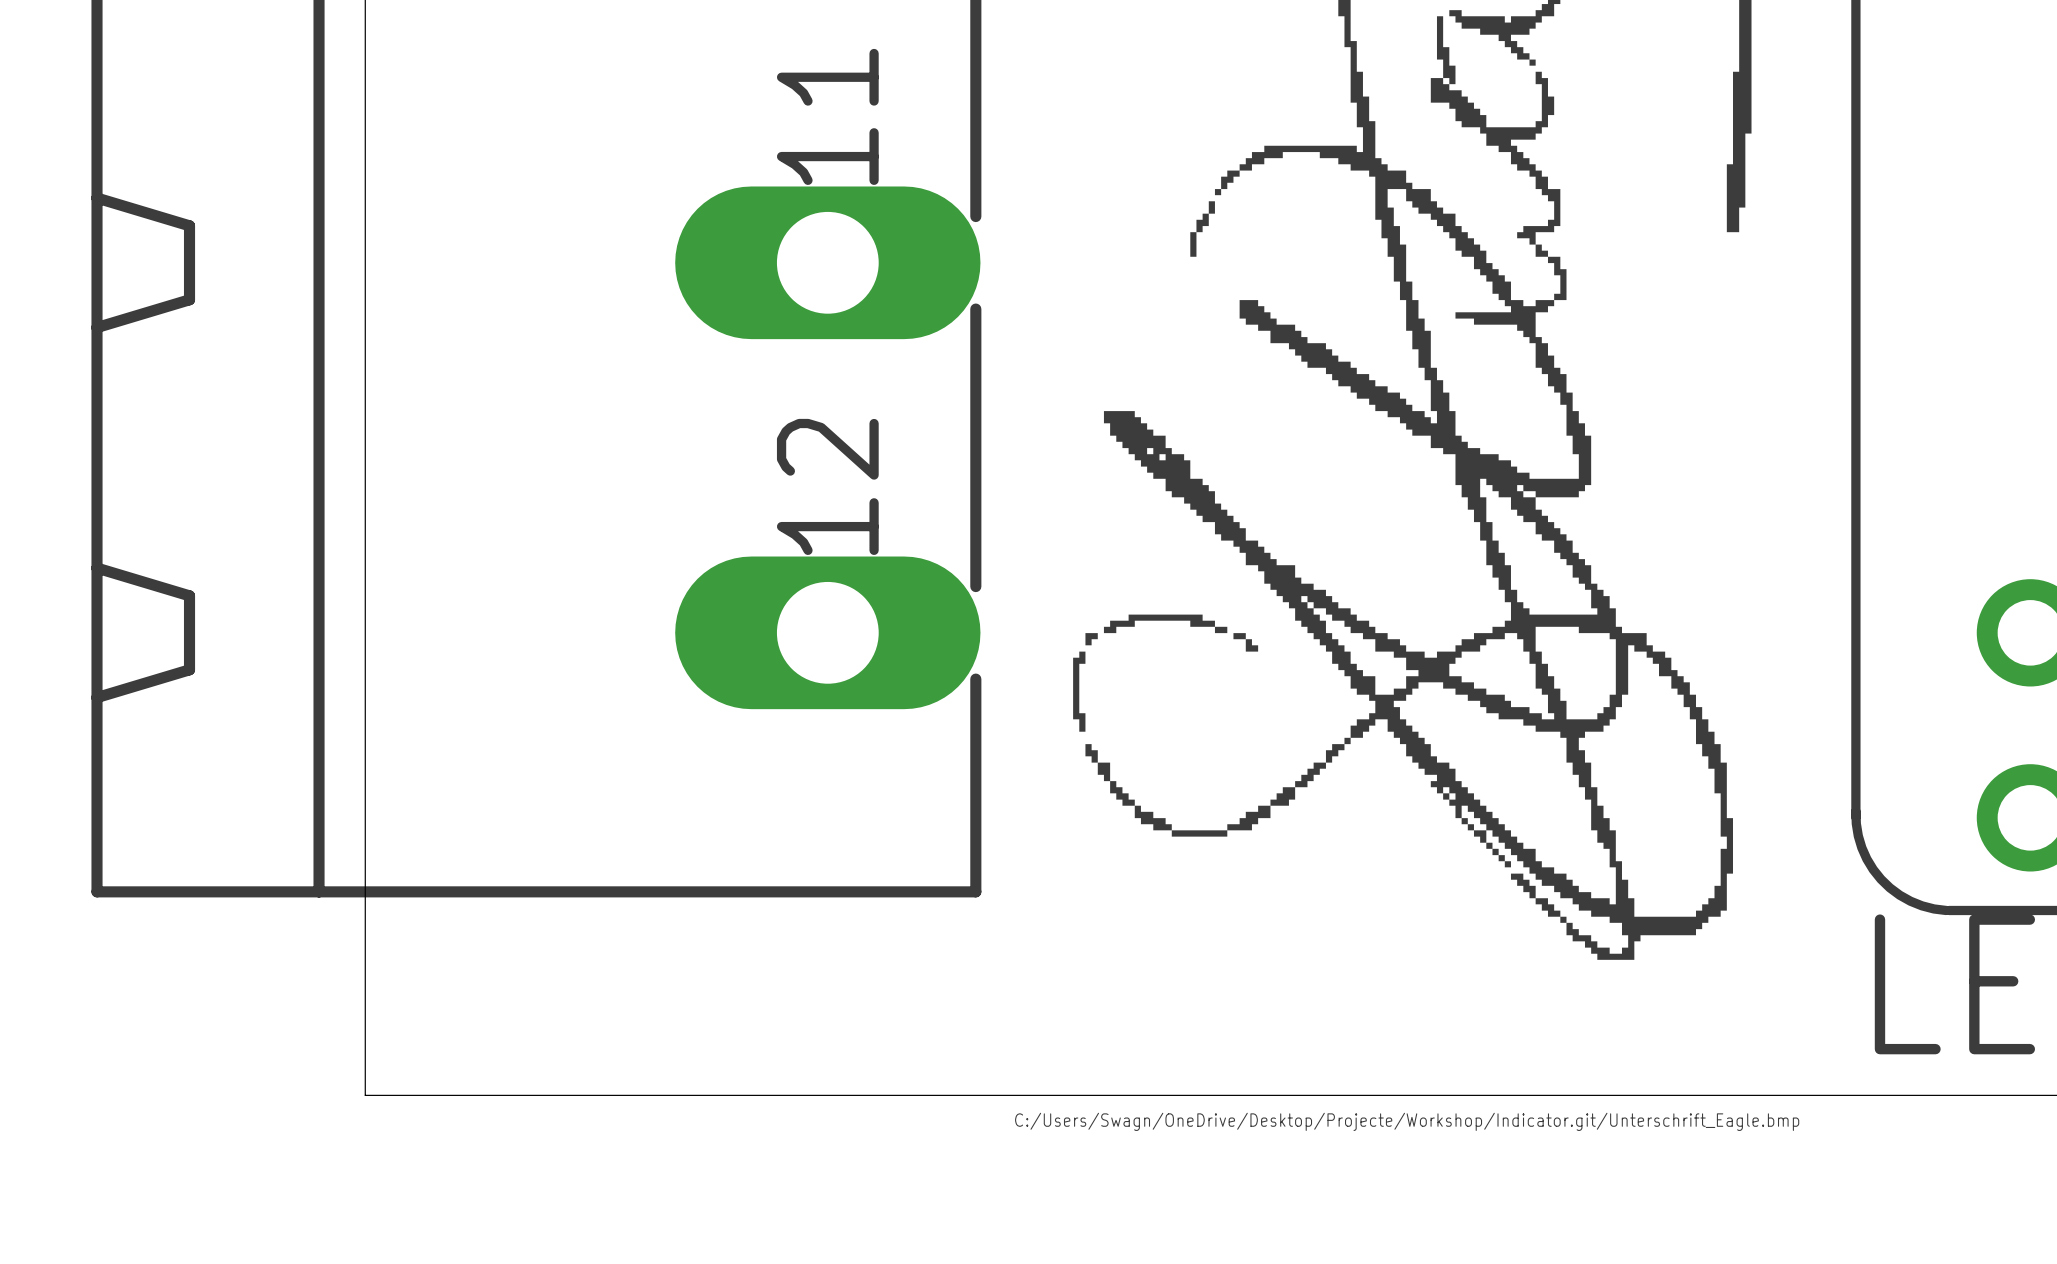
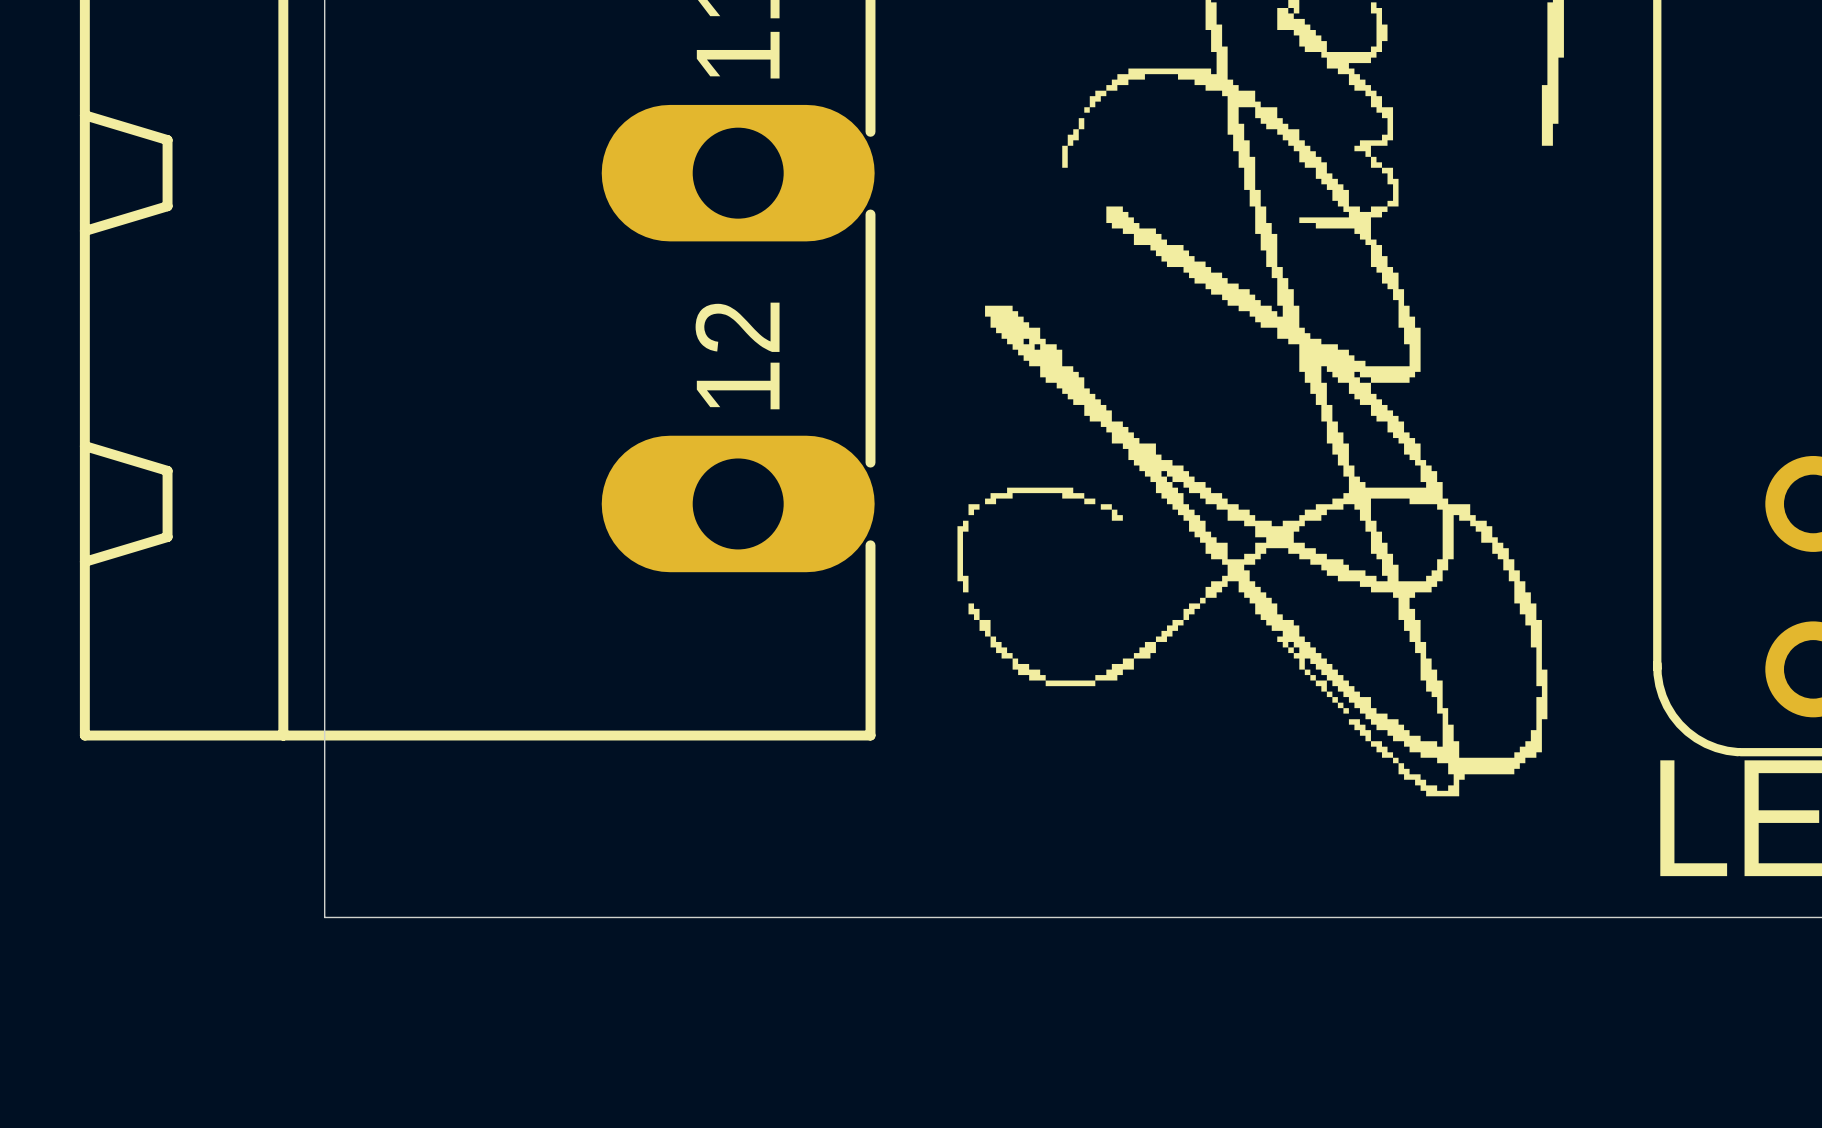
text: C:/Users/Swagn/OneDrive/Desktop/Projecte/Workshop/Indicator.git/Unterschrift_Eagle.bmp (1407, 1121) -> none

